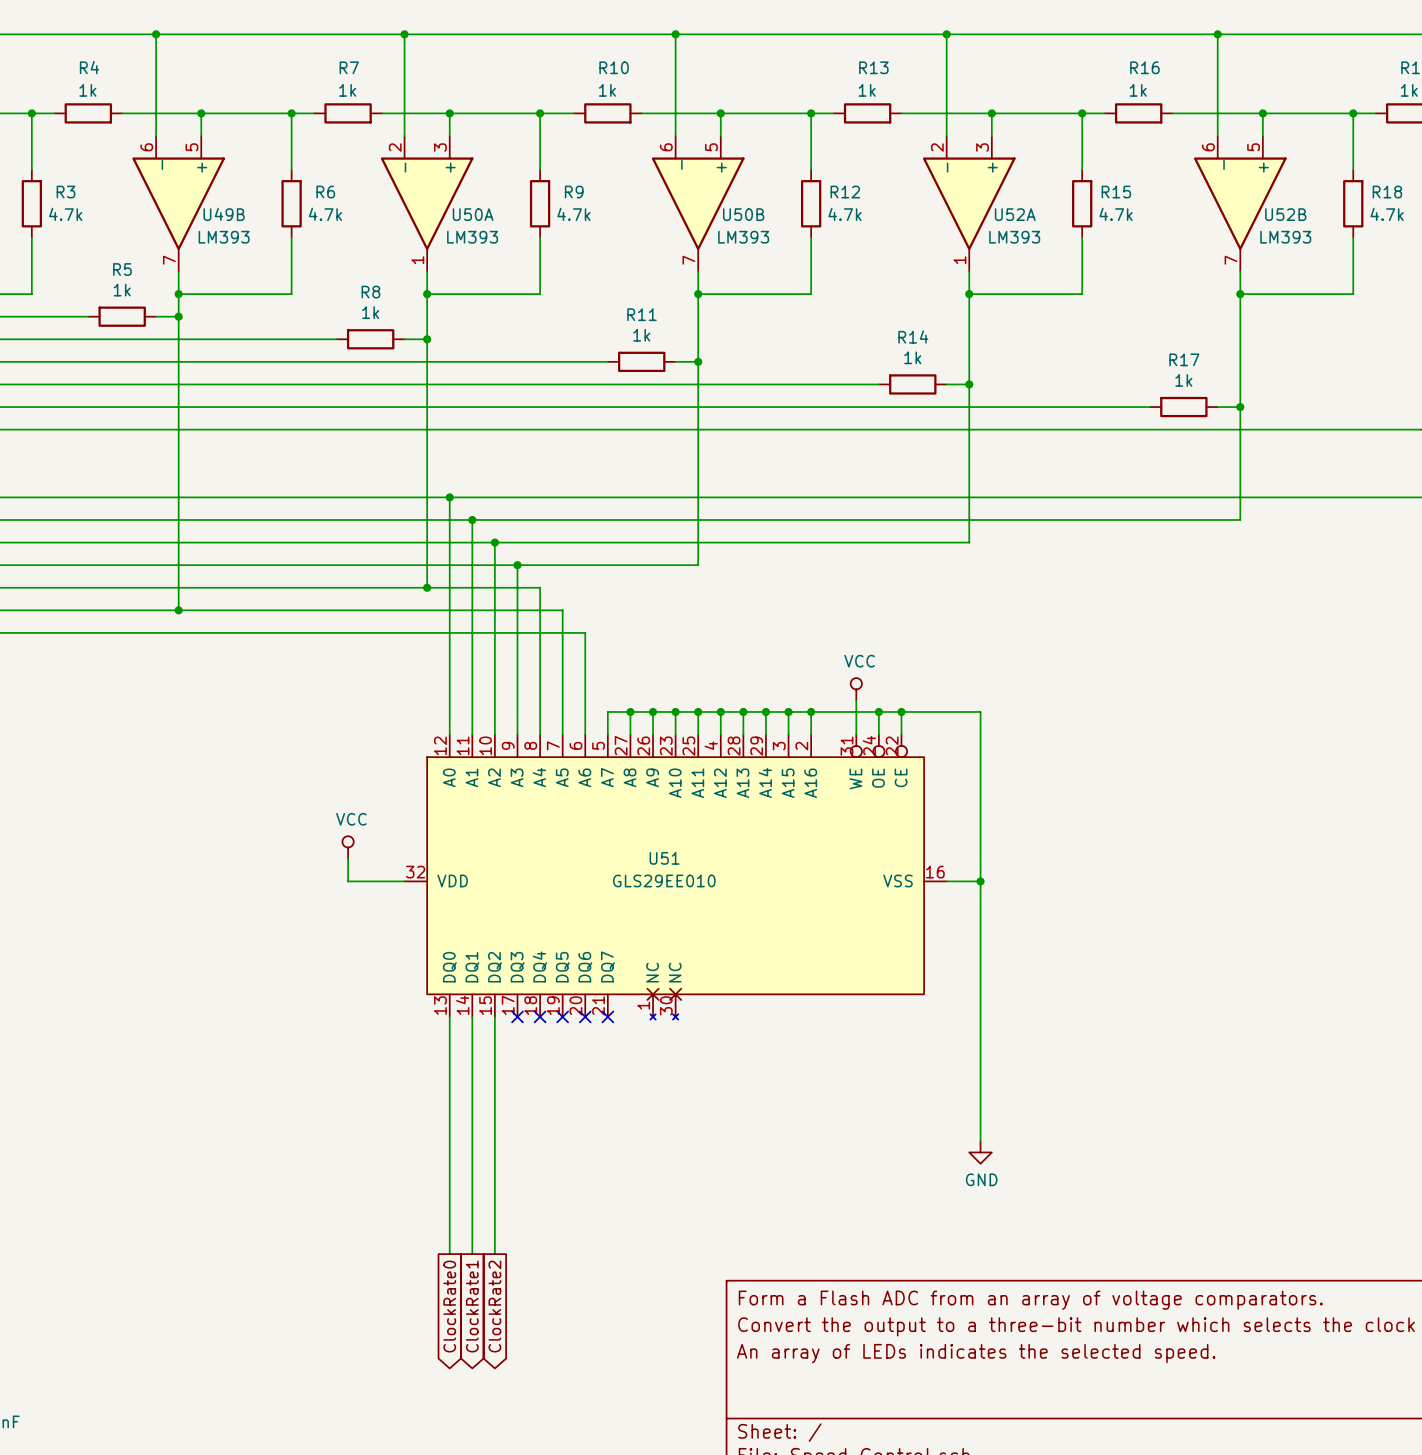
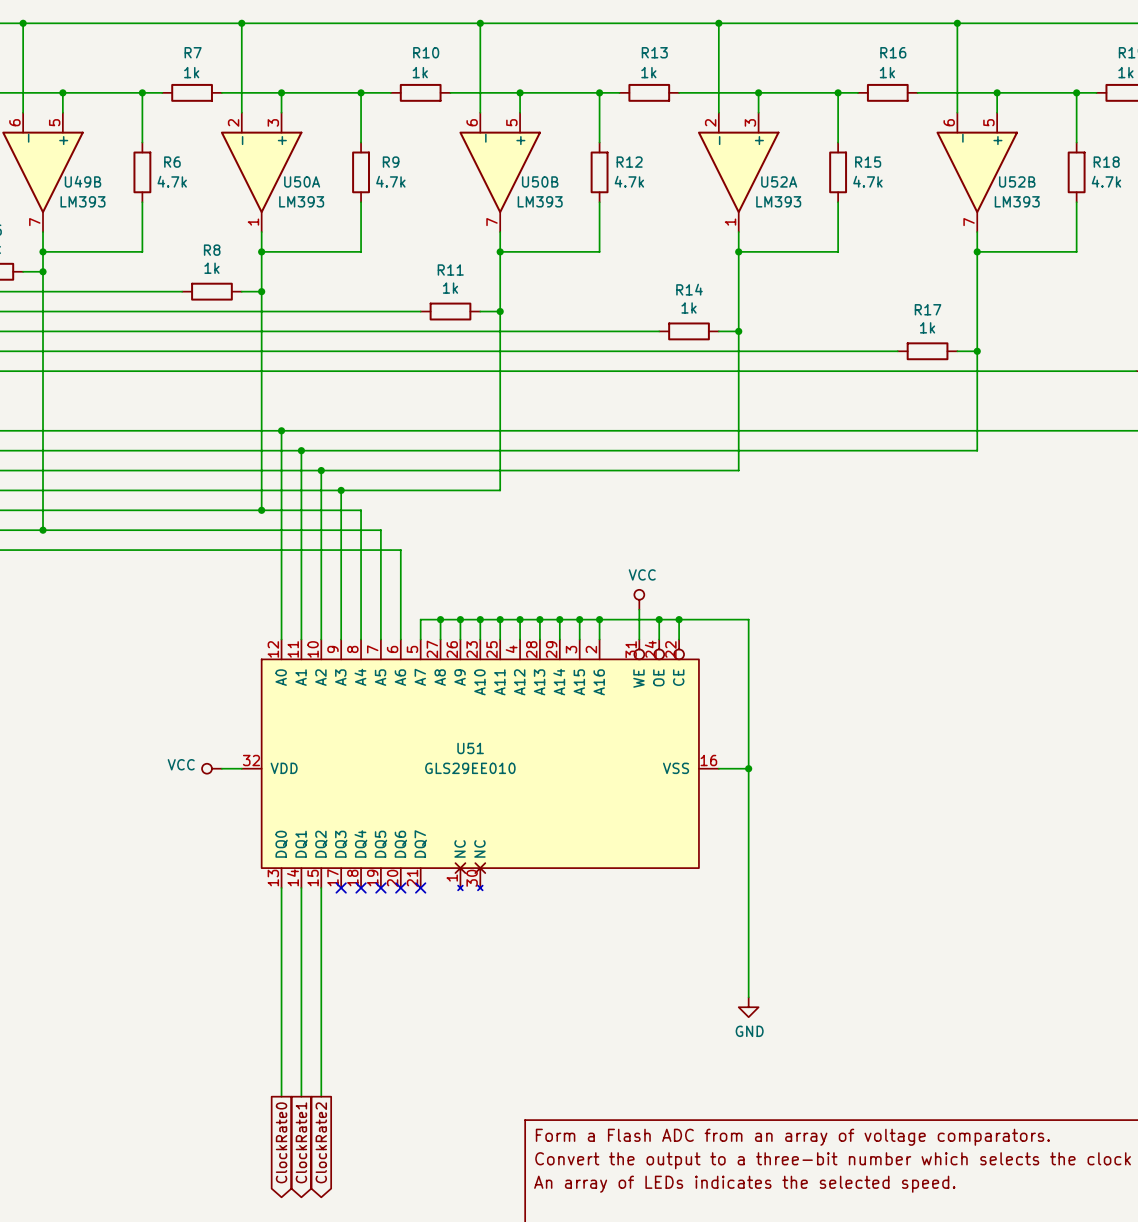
power symbol rotation: 0° (348, 847) -> 90° counterclockwise (211, 768)
power symbol position: VCC (348, 847) -> VCC (211, 768)
wire: (348, 858) (348, 881) (381, 881) -> none

